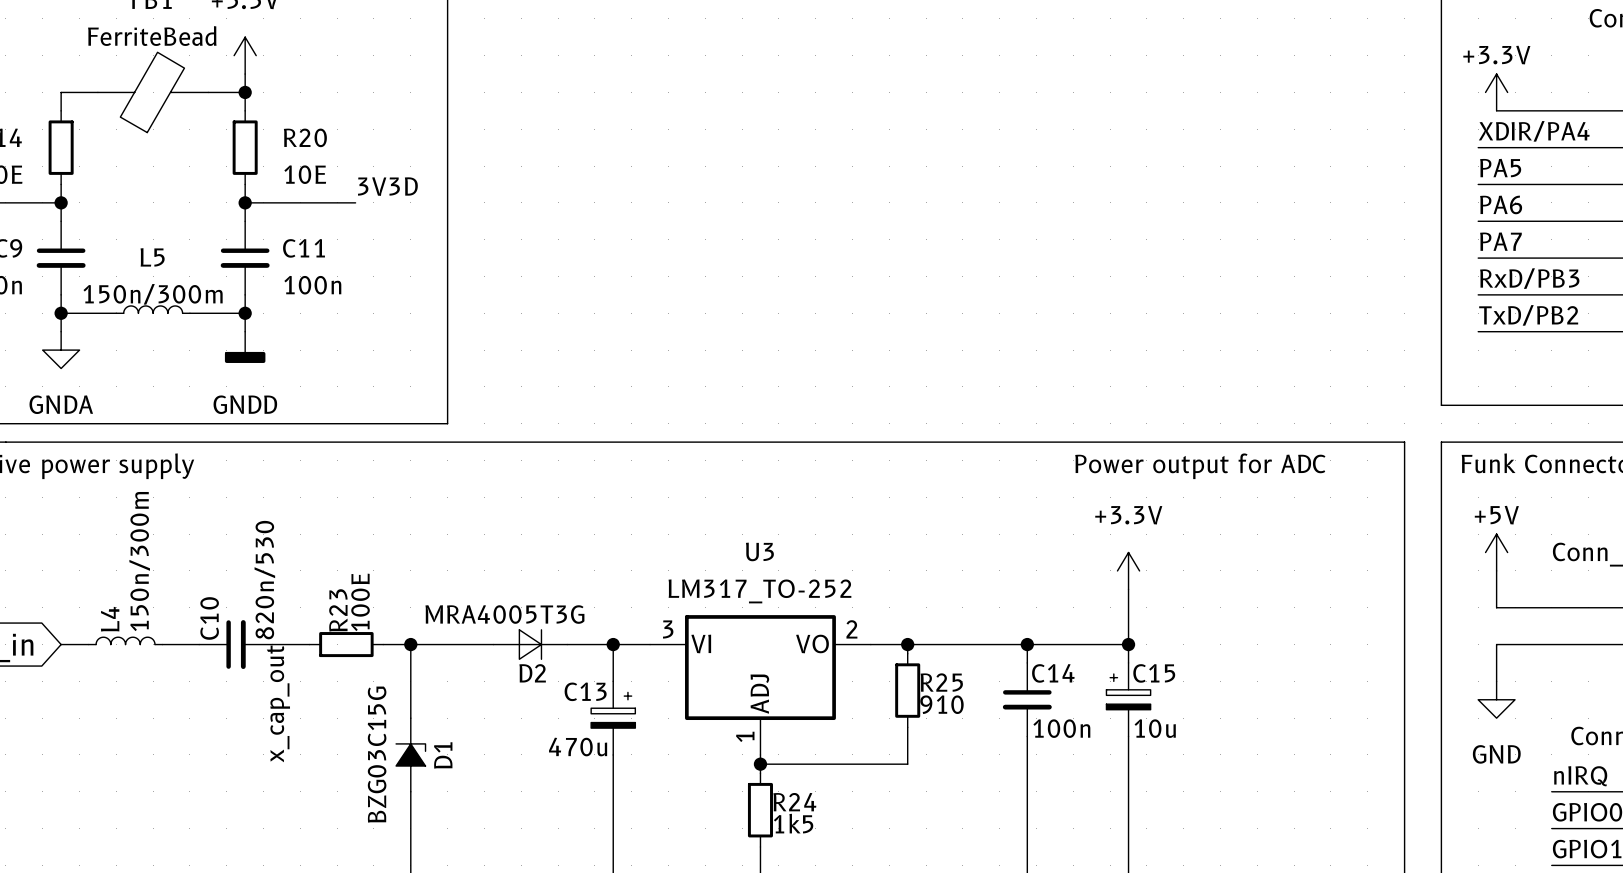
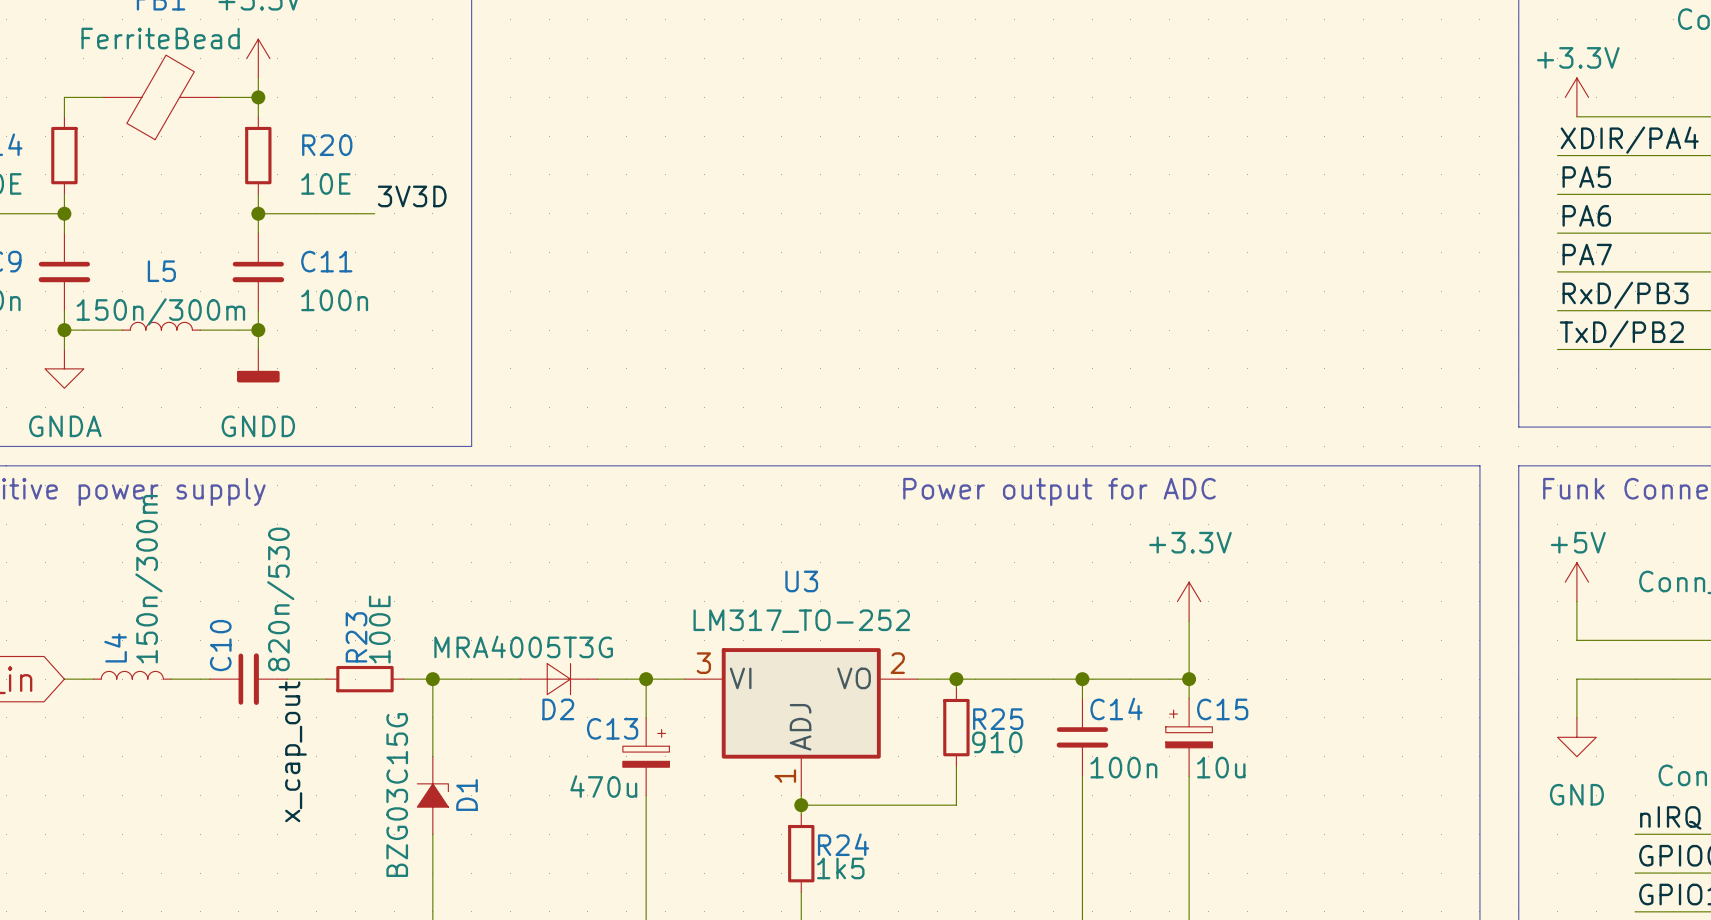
text position: Power output for ADC (1200, 466) -> Power output for ADC (1059, 491)

